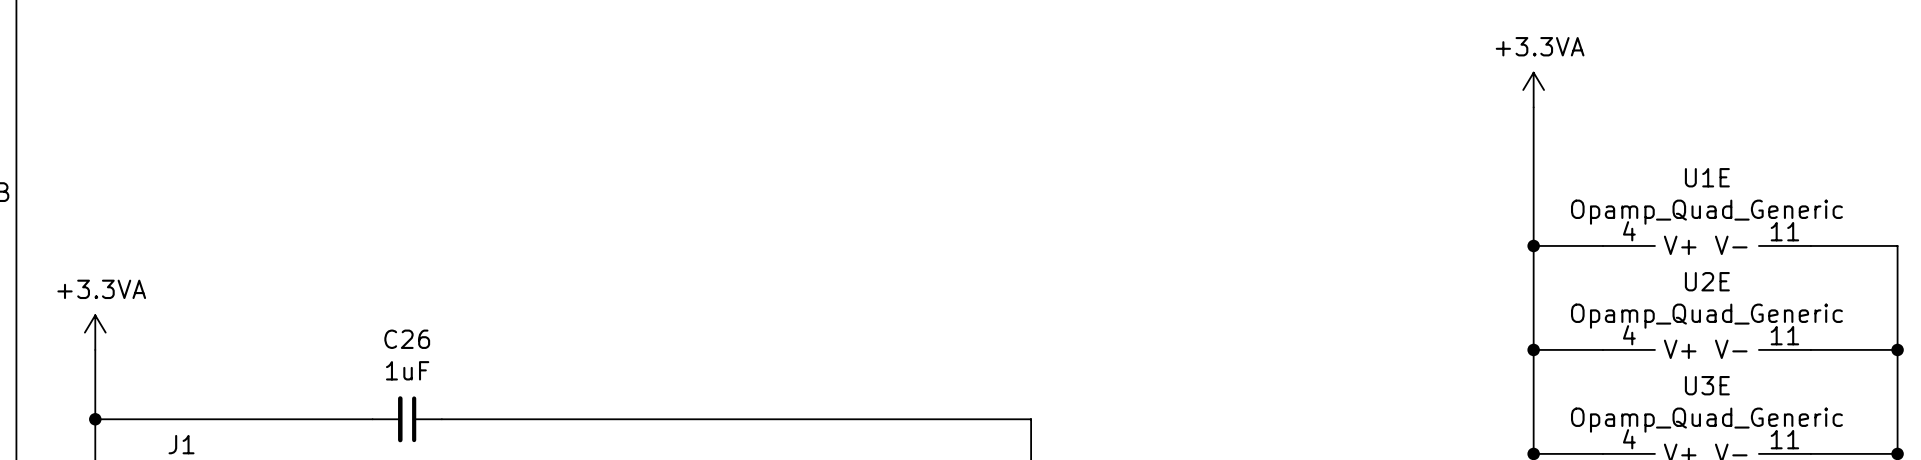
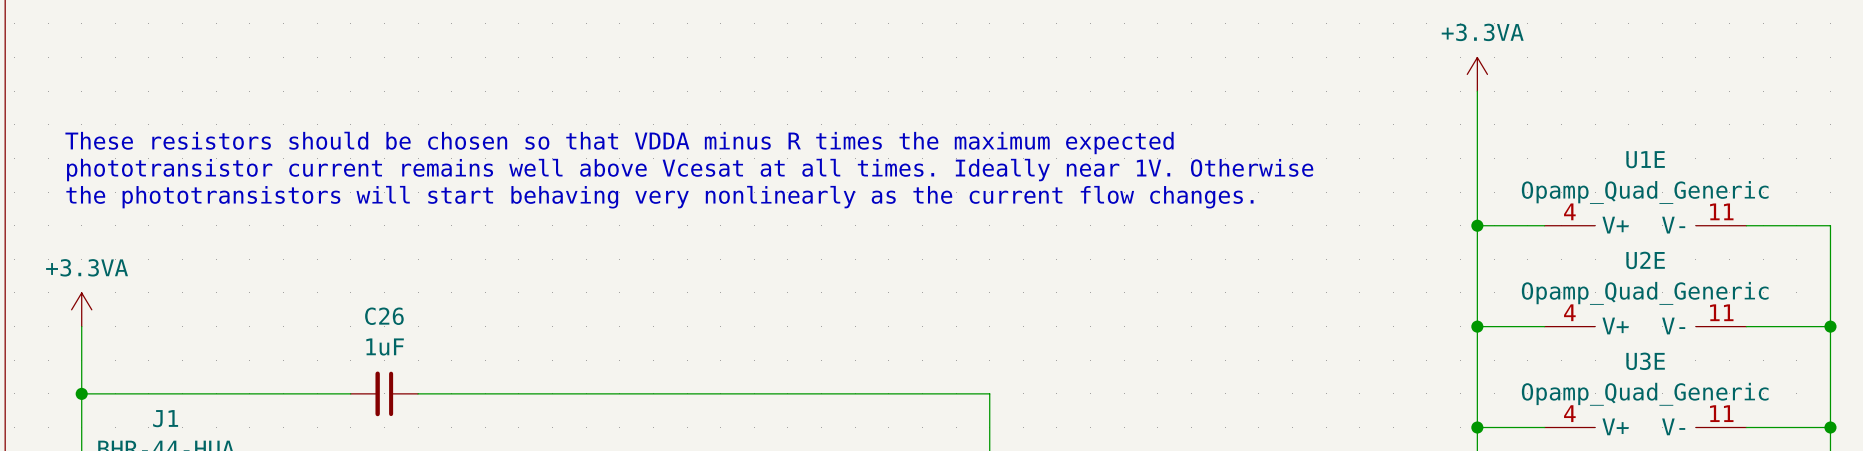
text: none -> These resistors should be chosen so that VDDA minus R times the maximum expected (619, 142)
text: none -> phototransistor current remains well above Vcesat at all times. Ideally near 1V. Otherwise (690, 170)
text: none -> the phototransistors will start behaving very nonlinearly as the current flow changes. (659, 197)

